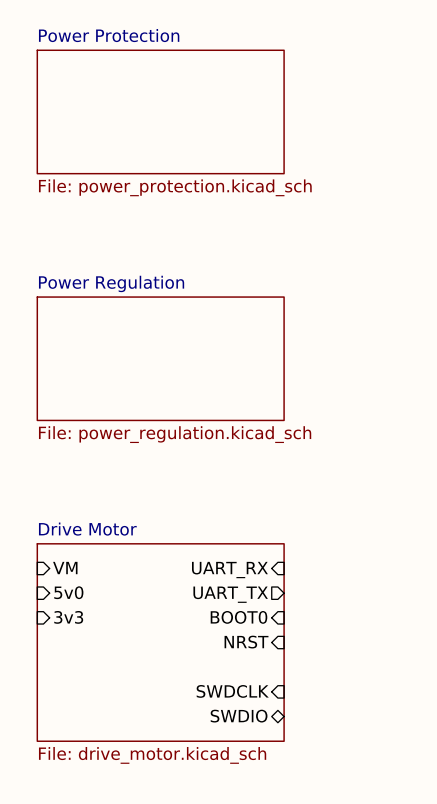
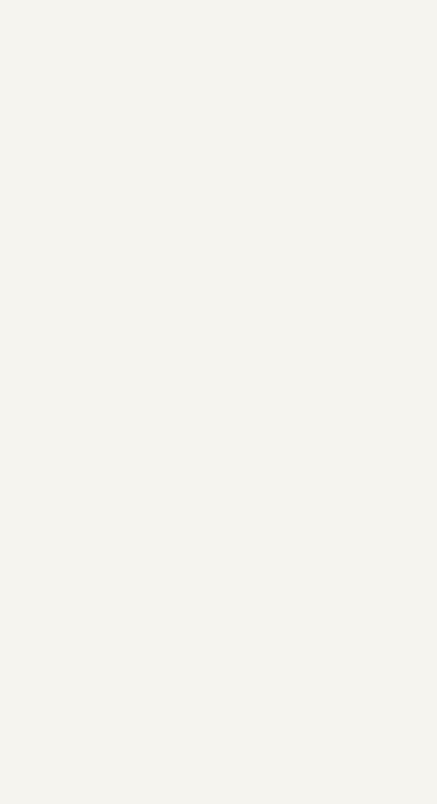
sheet Power Protection: File: power_protection.kicad_sch (160, 111) -> none
sheet Power Regulation: File: power_regulation.kicad_sch (160, 358) -> none
sheet pin: VM (65, 568) -> none
sheet pin: UART_RX (229, 570) -> none
sheet pin: 5v0 (68, 592) -> none
sheet pin: UART_TX (230, 594) -> none
sheet pin: 3v3 (68, 617) -> none
sheet pin: BOOT0 (238, 617) -> none
sheet Drive Motor: File: drive_motor.kicad_sch (160, 642) -> none
sheet pin: NRST (246, 642) -> none
sheet pin: SWDCLK (232, 691) -> none
sheet pin: SWDIO (239, 716) -> none

